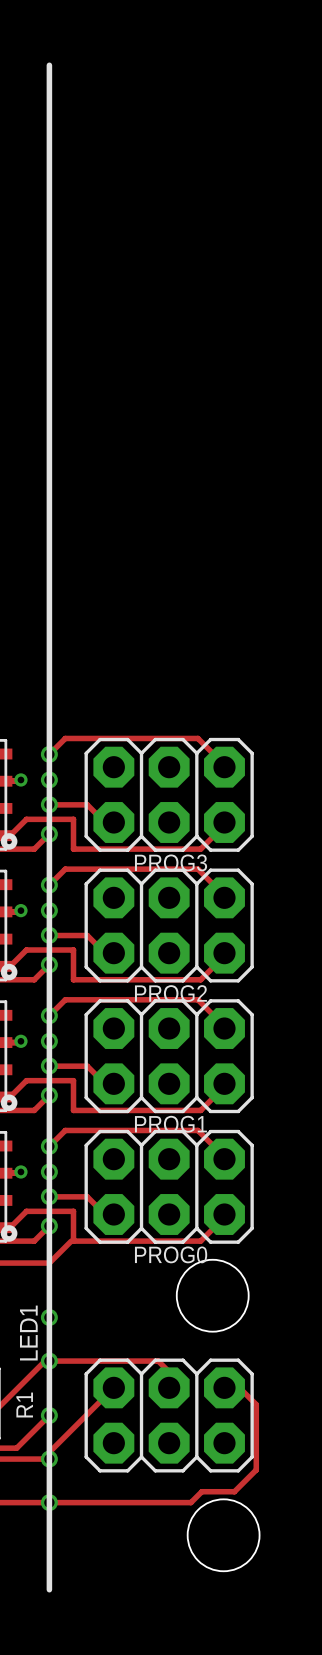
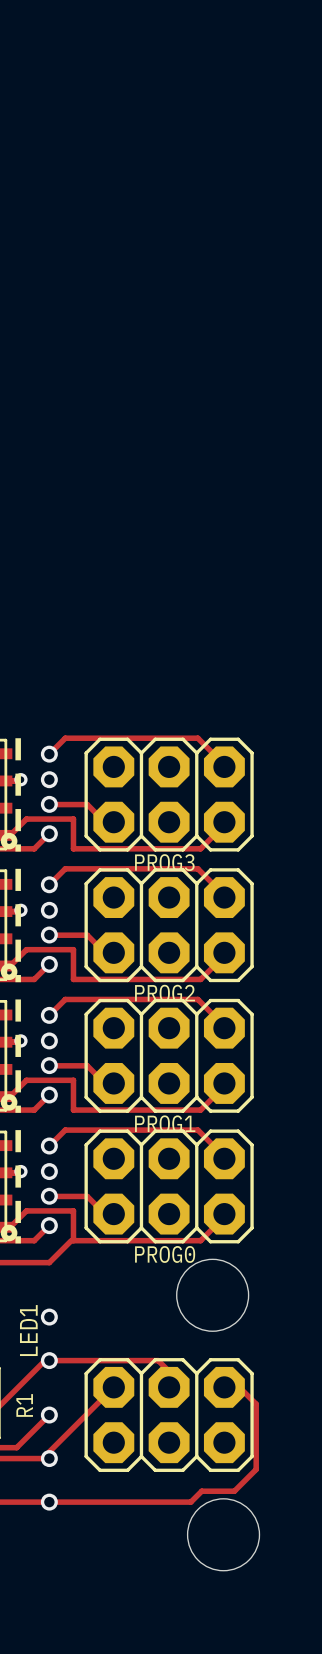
line: (49, 65) (49, 1589) -> none
line: none -> (18, 738) (18, 851)
line: none -> (18, 868) (18, 982)
line: none -> (18, 999) (18, 1112)
line: none -> (18, 1130) (18, 1243)

